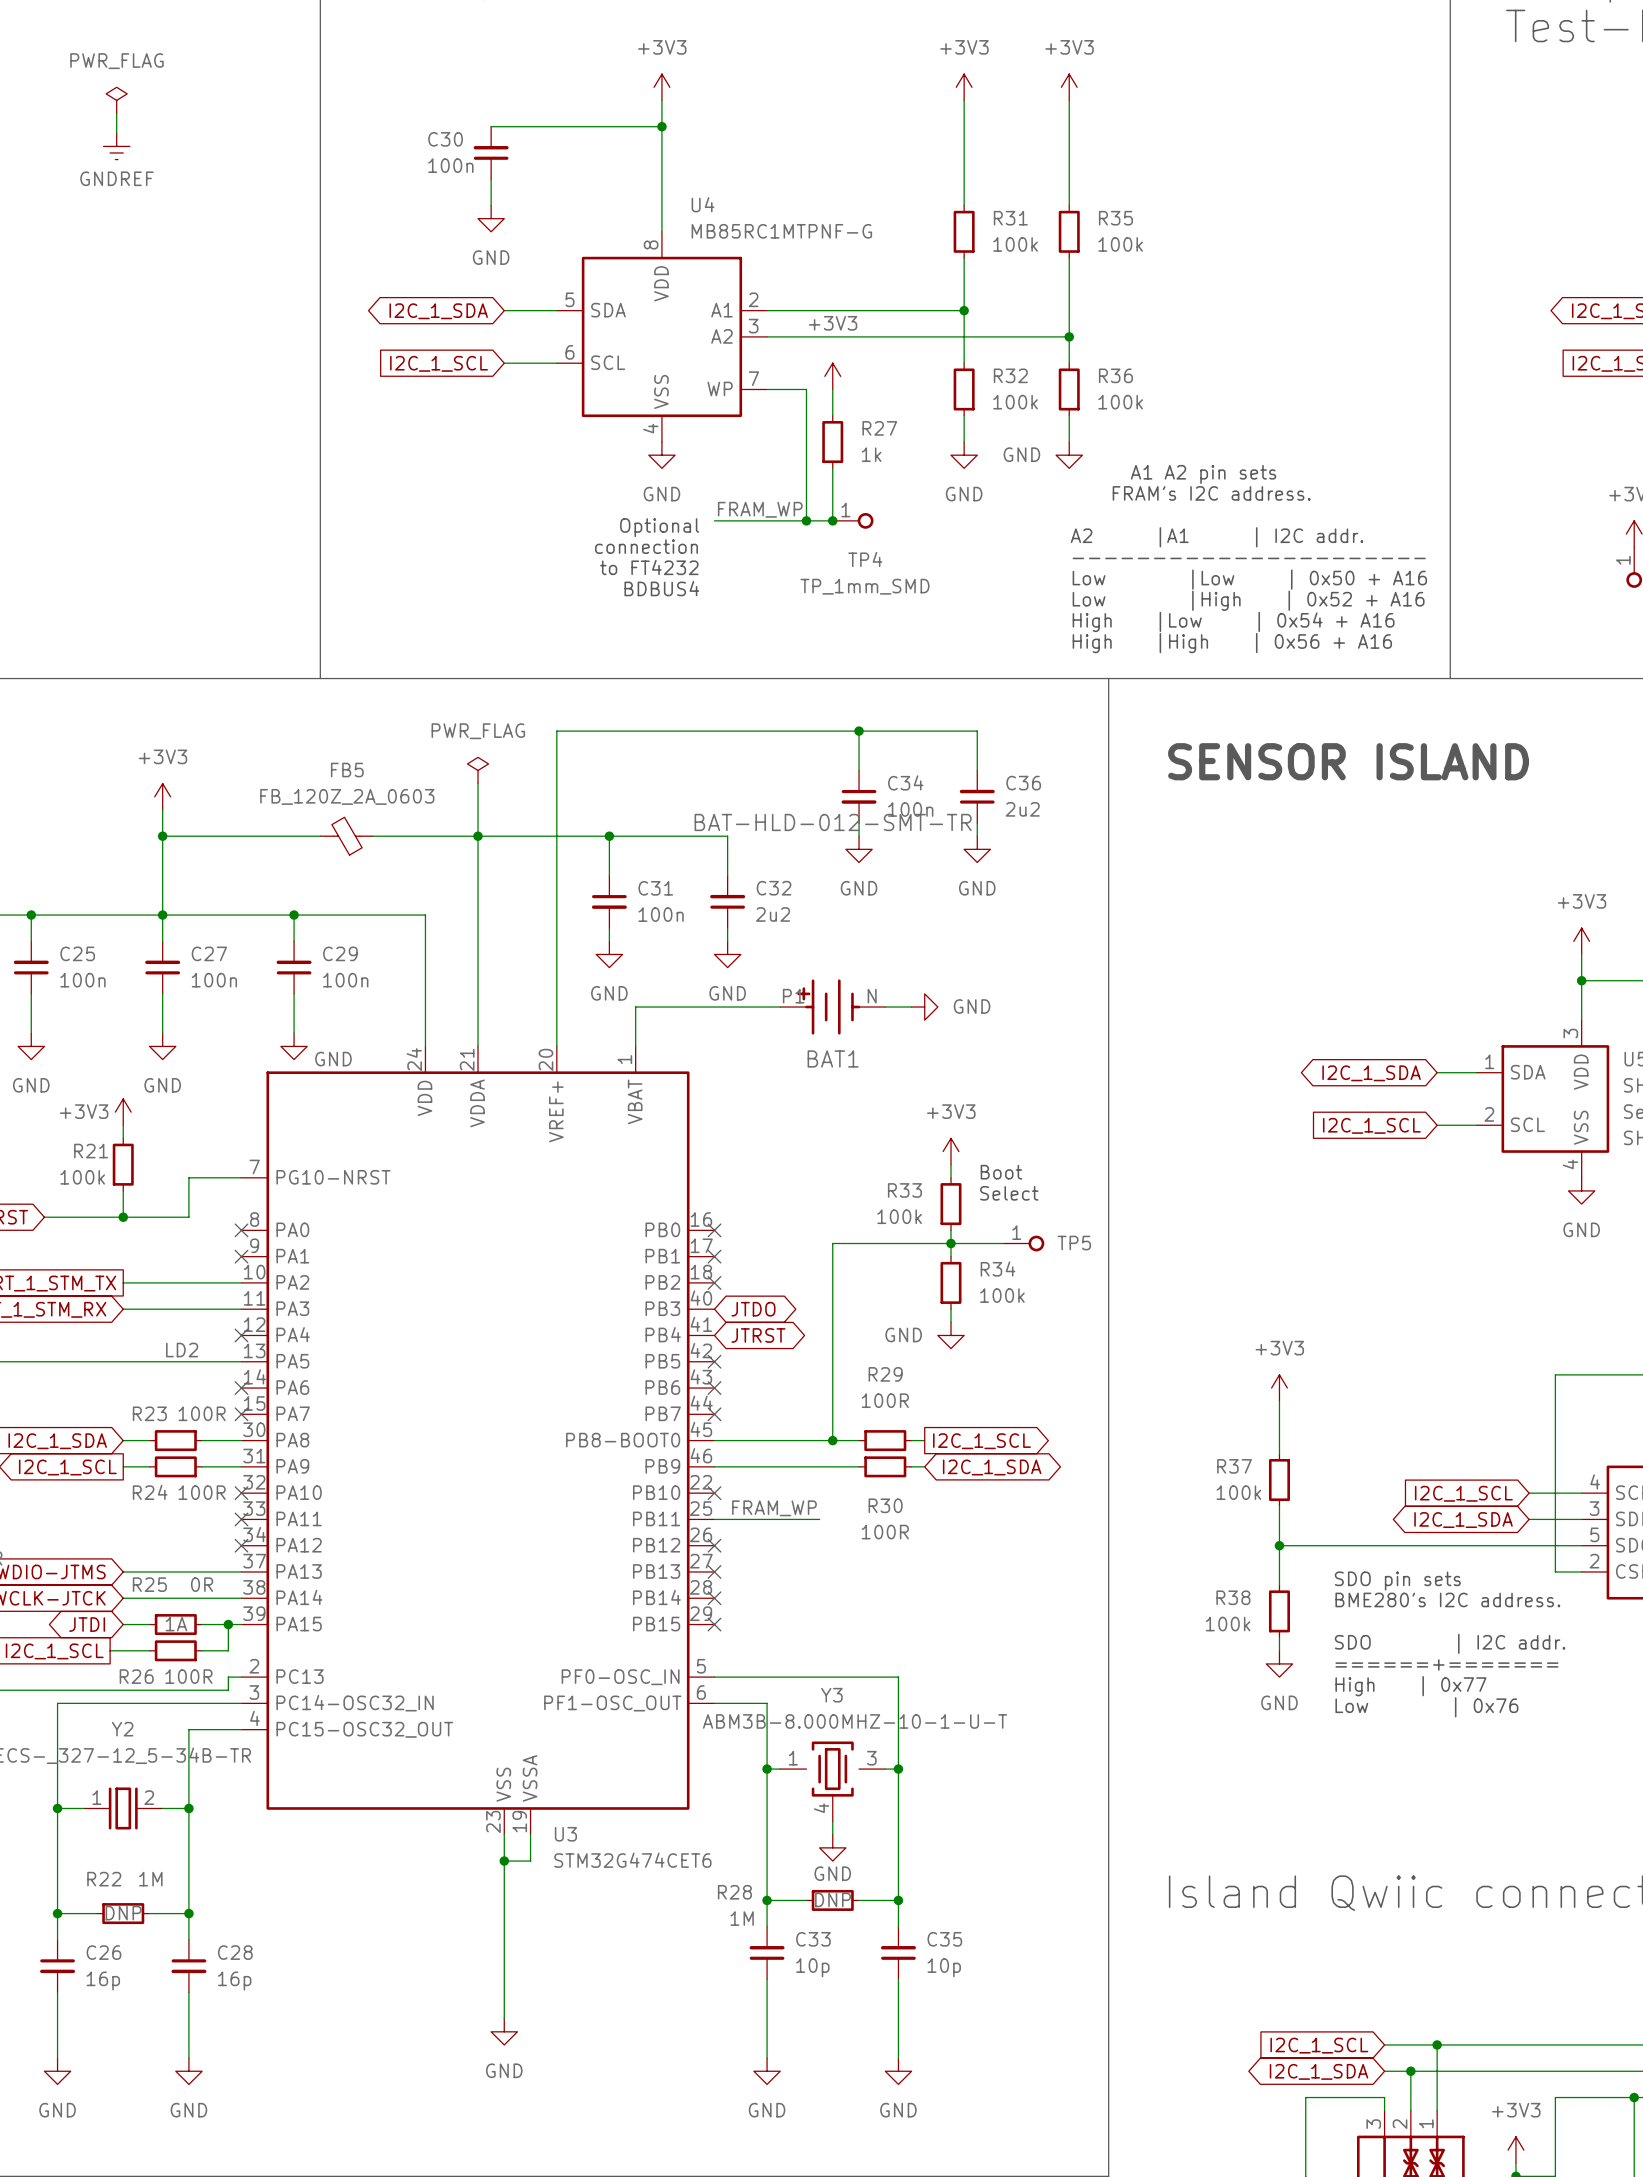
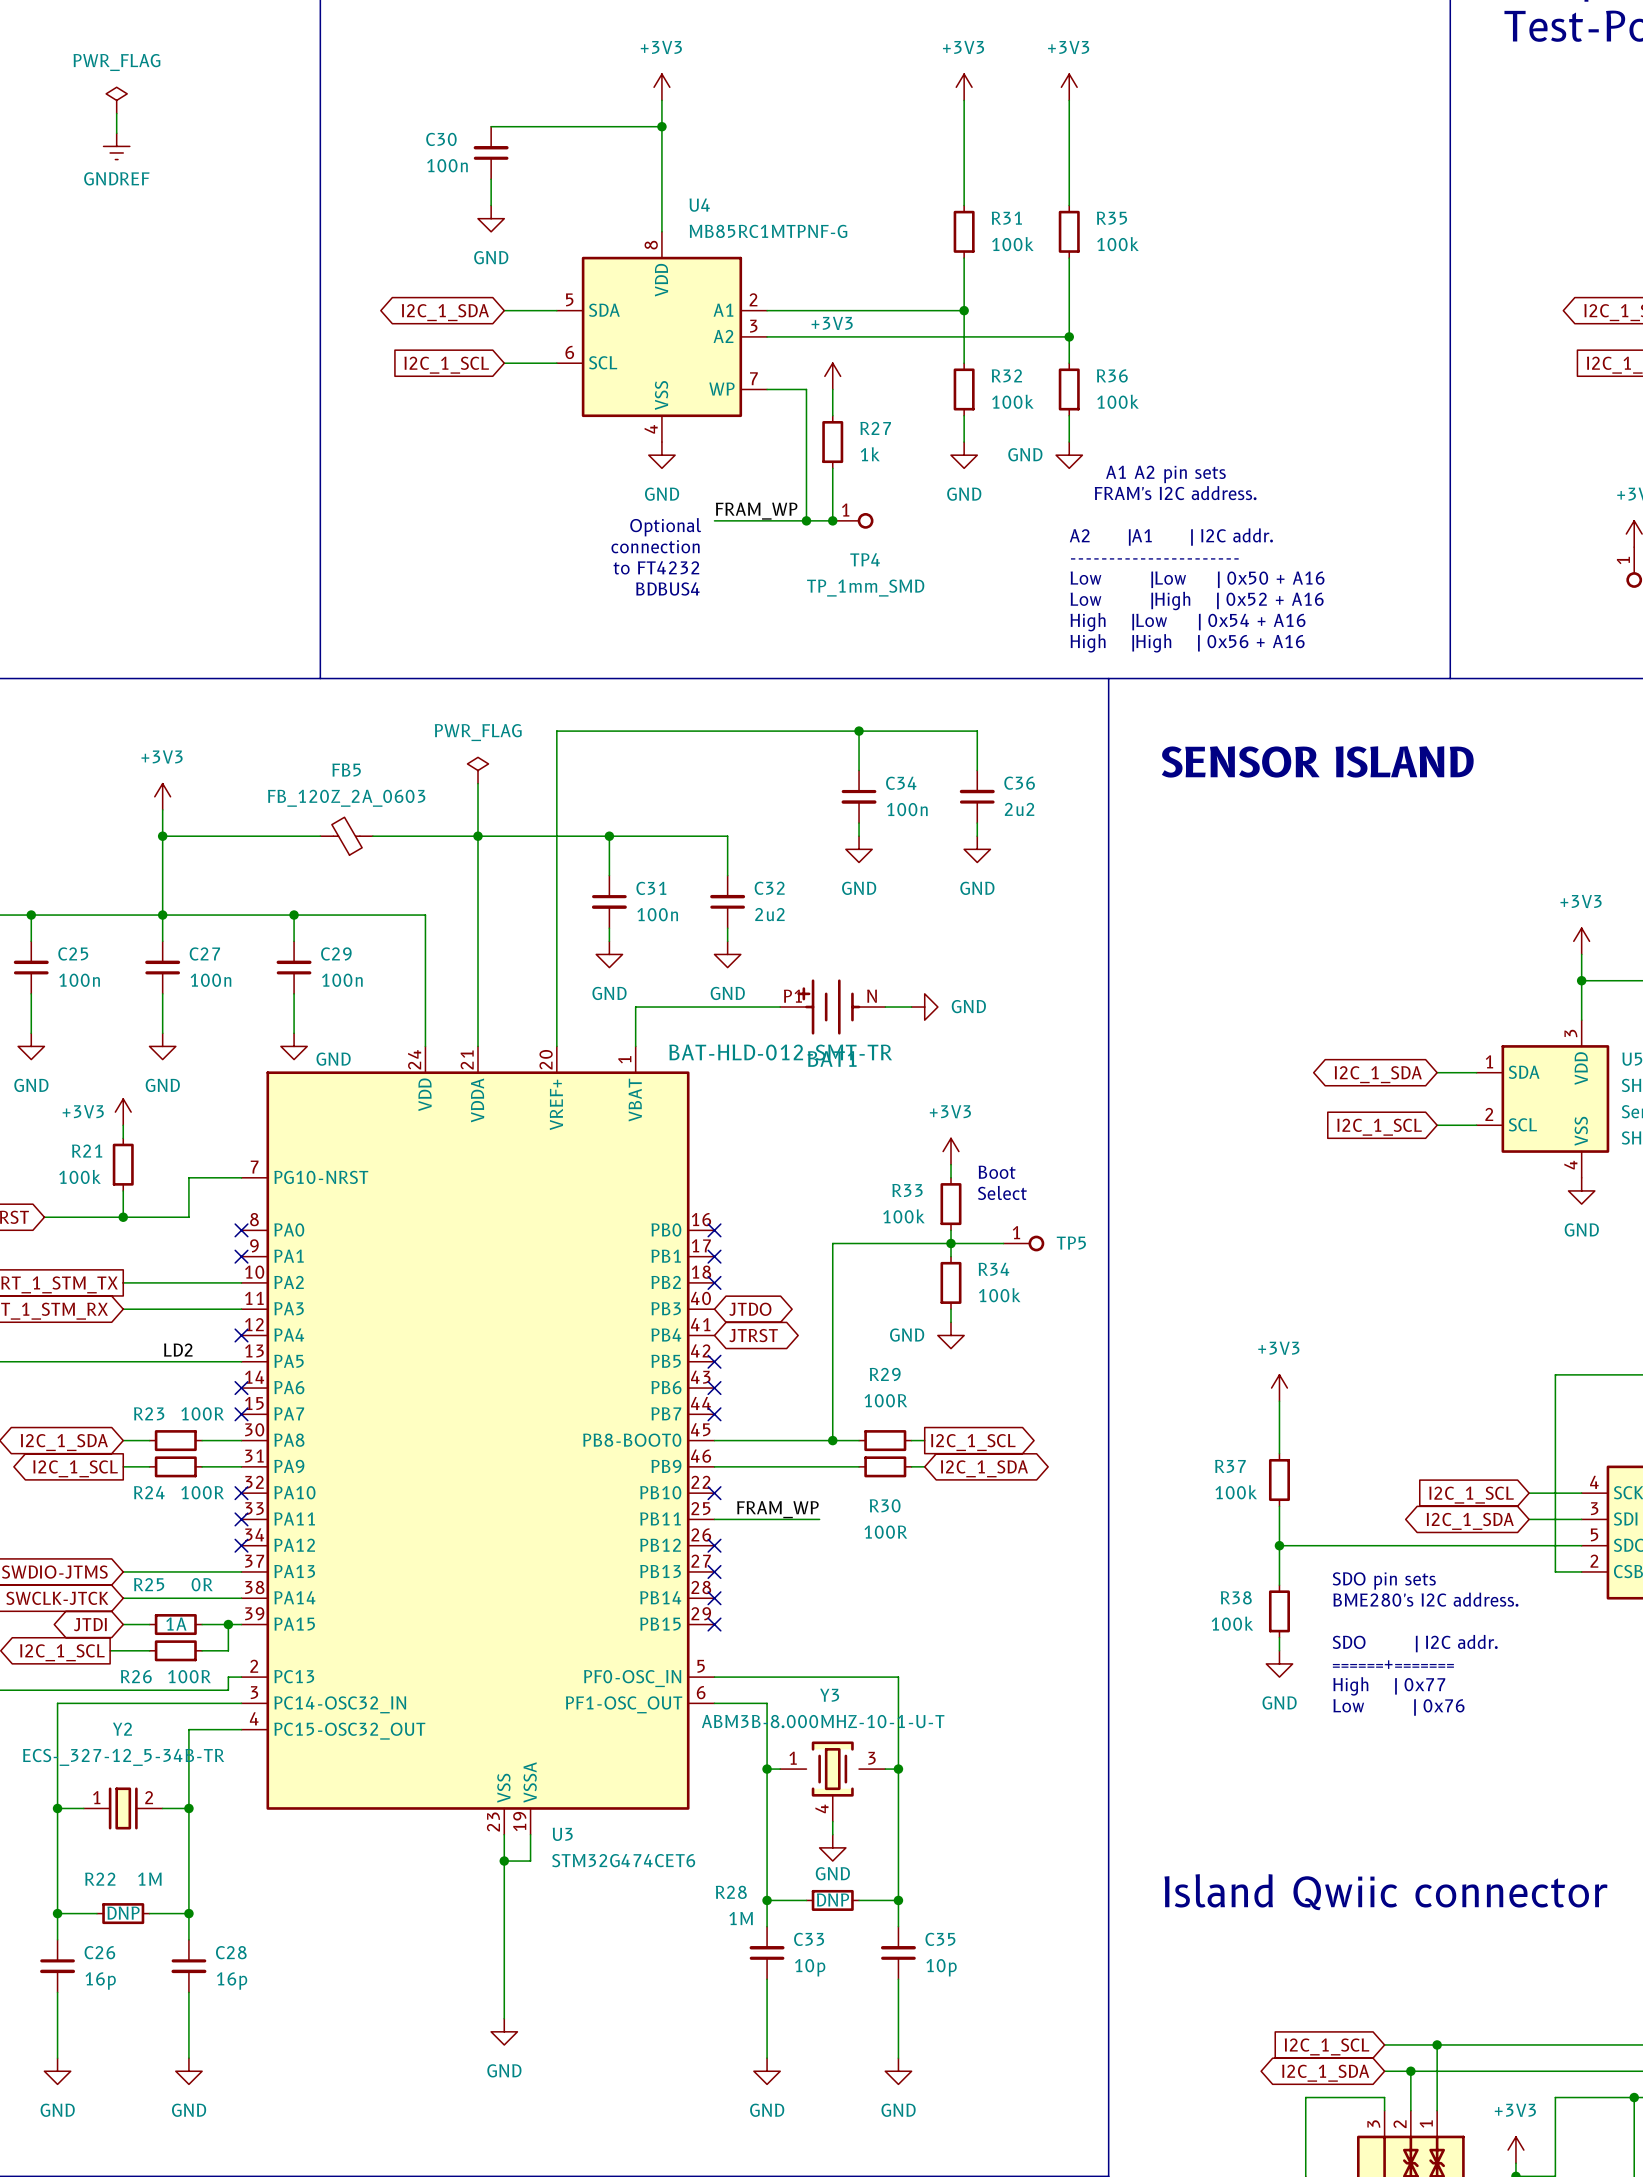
BAT1 value position: BAT-HLD-012-SMT-TR (833, 822) -> BAT-HLD-012-SMT-TR (780, 1052)

